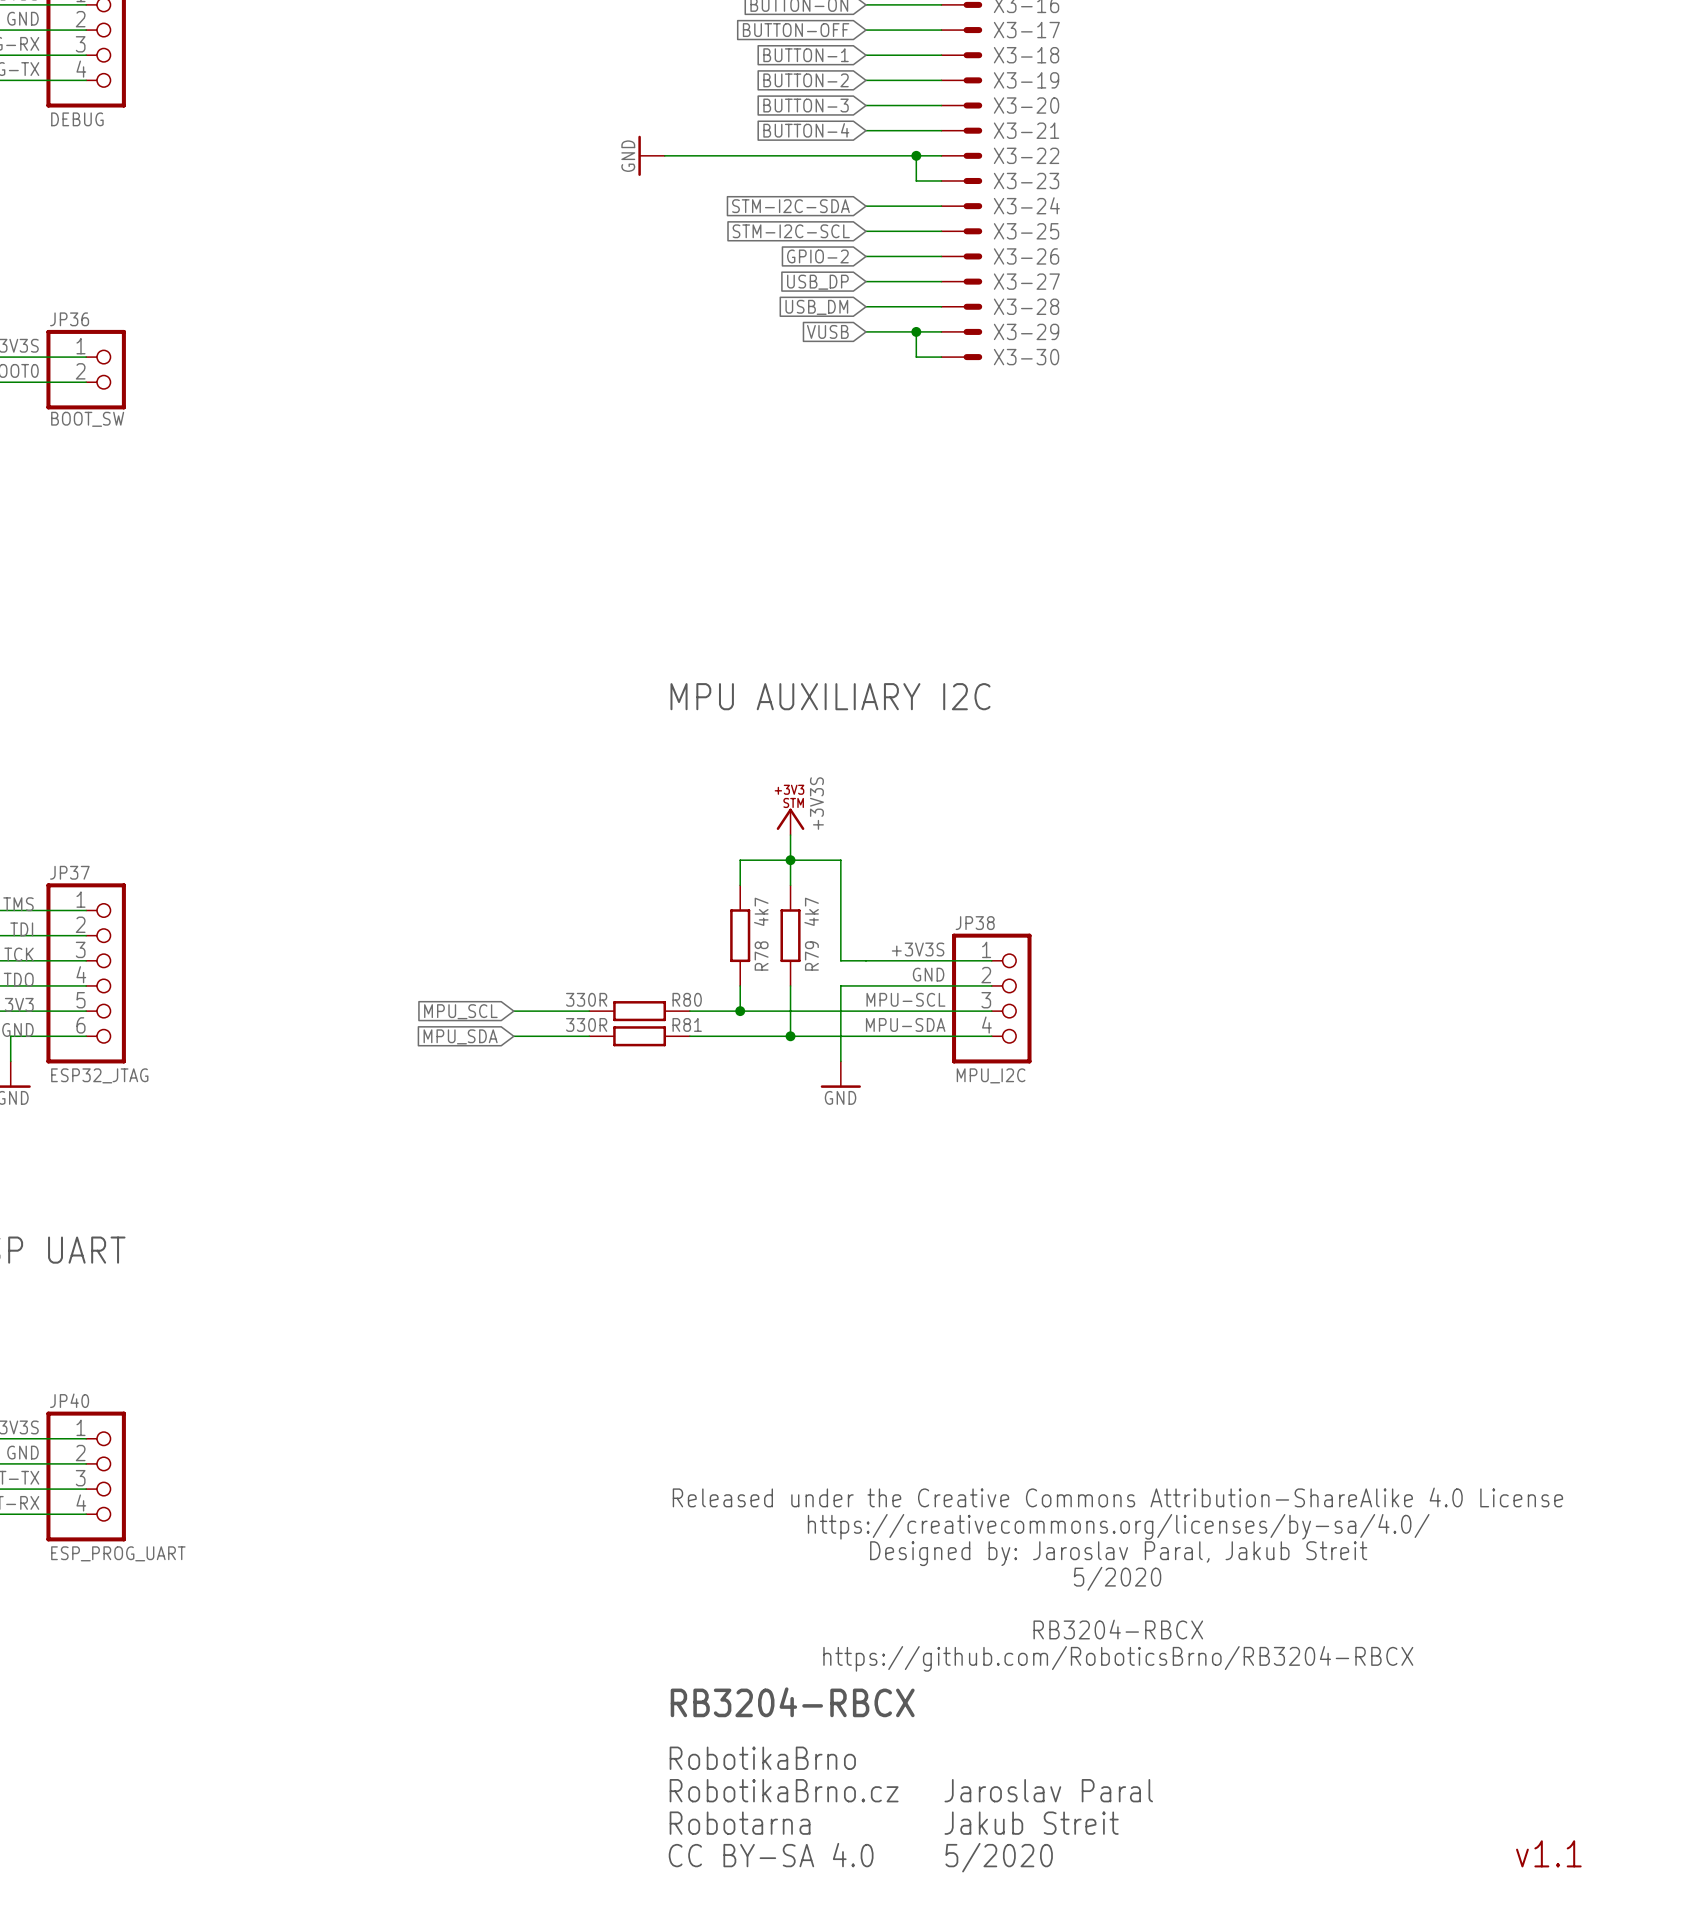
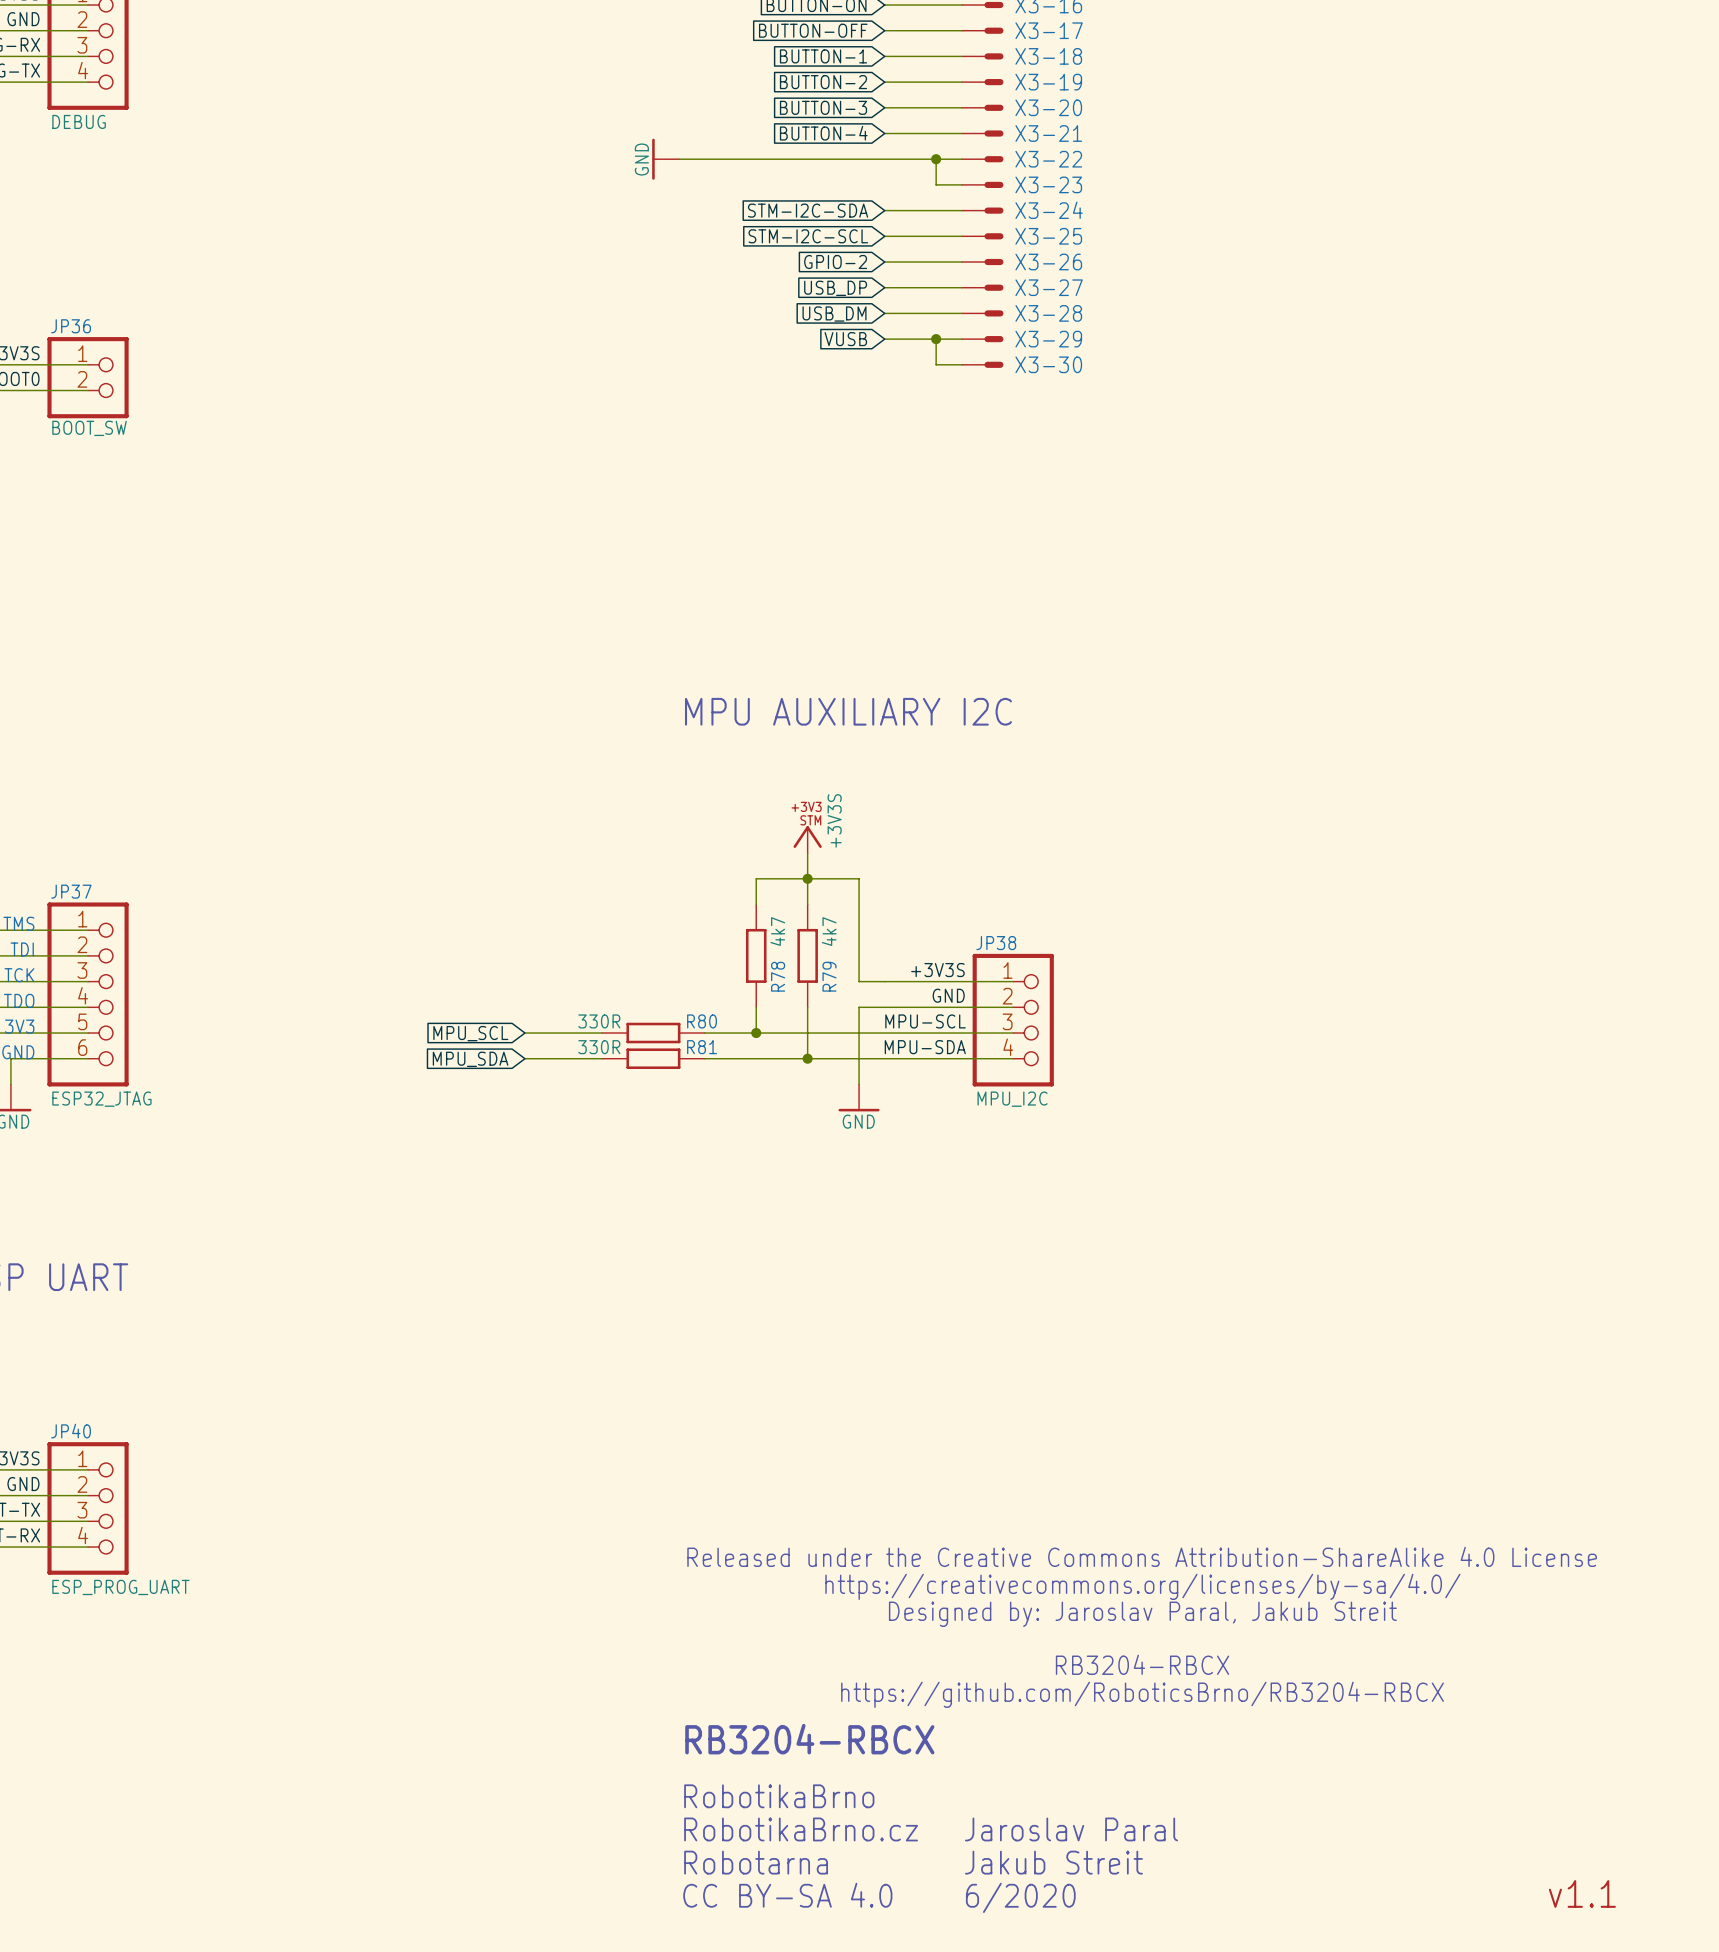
text: Released under the Creative Commons Attribution-ShareAlike 4.0 License (1117, 1497) -> none
text: https://creativecommons.org/licenses/by-sa/4.0/ (1118, 1526) -> Released under the Creative Commons Attribution-ShareAlike 4.0 License (1142, 1556)
text: Designed by: Jaroslav Paral, Jakub Streit (1118, 1553) -> https://creativecommons.org/licenses/by-sa/4.0/ (1142, 1586)
text: 5/2020 (1117, 1578) -> Designed by: Jaroslav Paral, Jakub Streit (1142, 1614)
text: 5/2020 (999, 1857) -> 6/2020 (1020, 1897)

